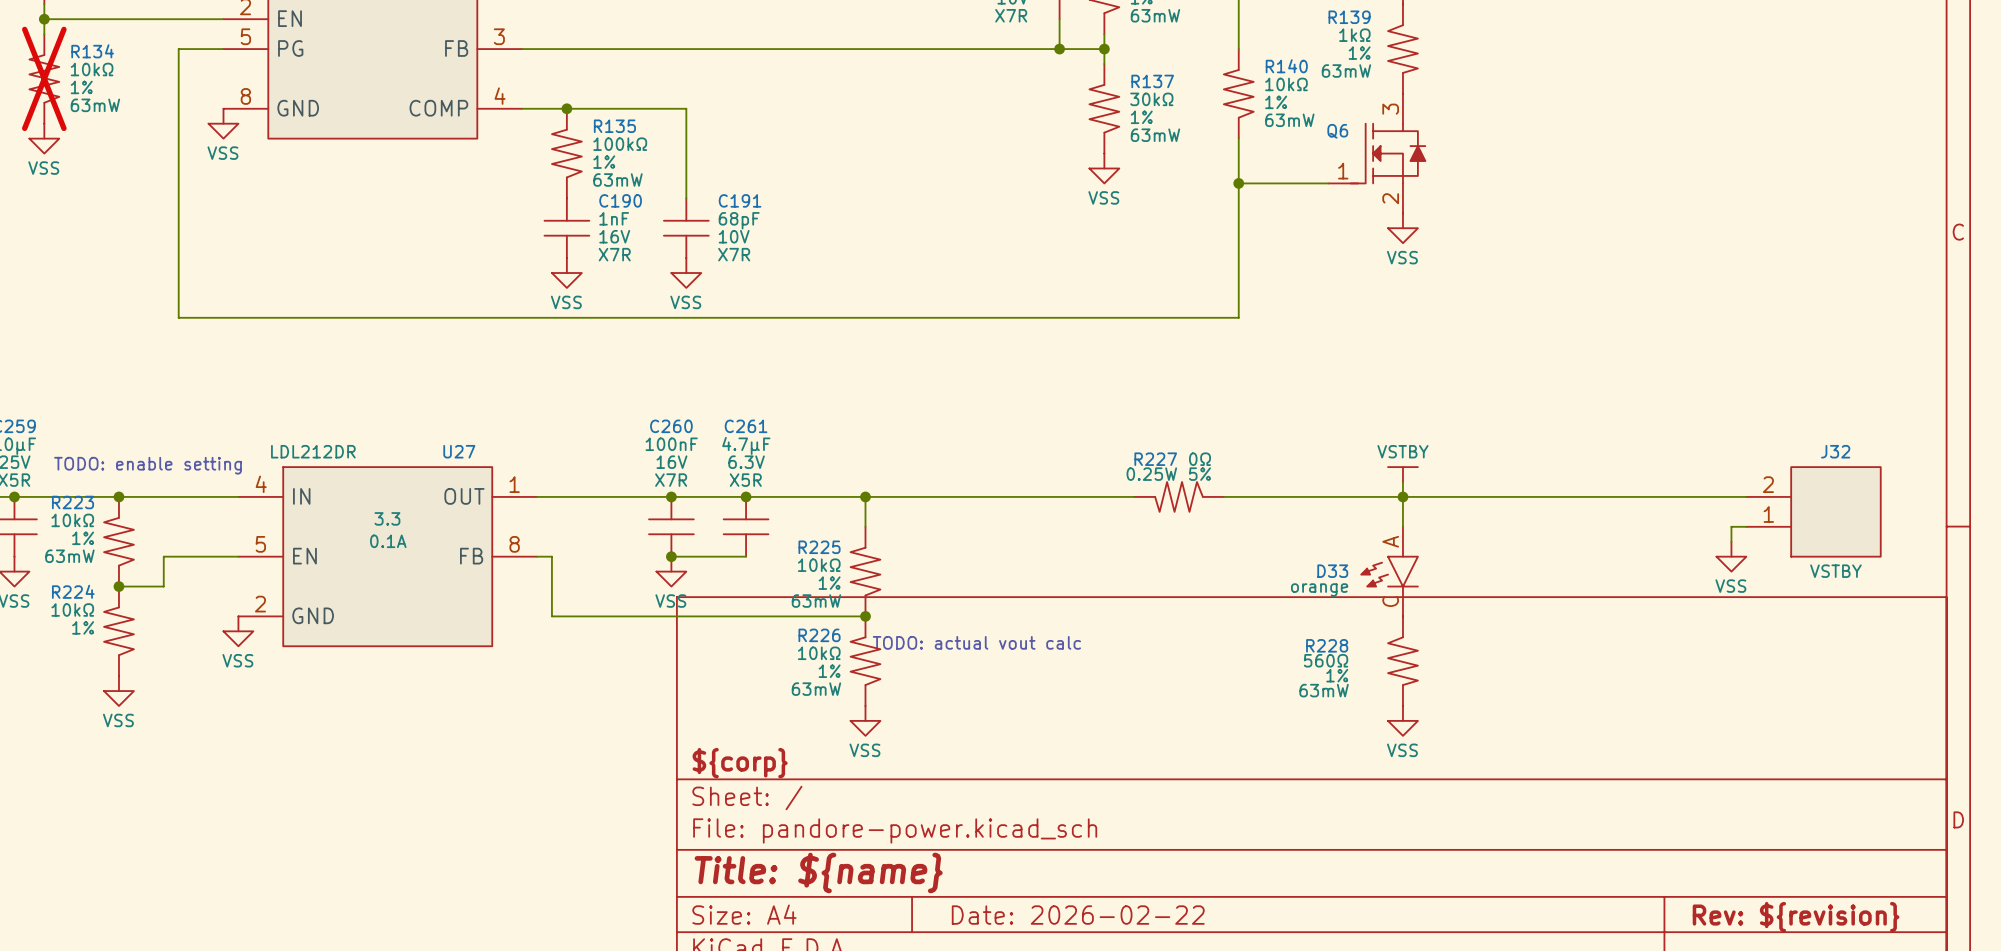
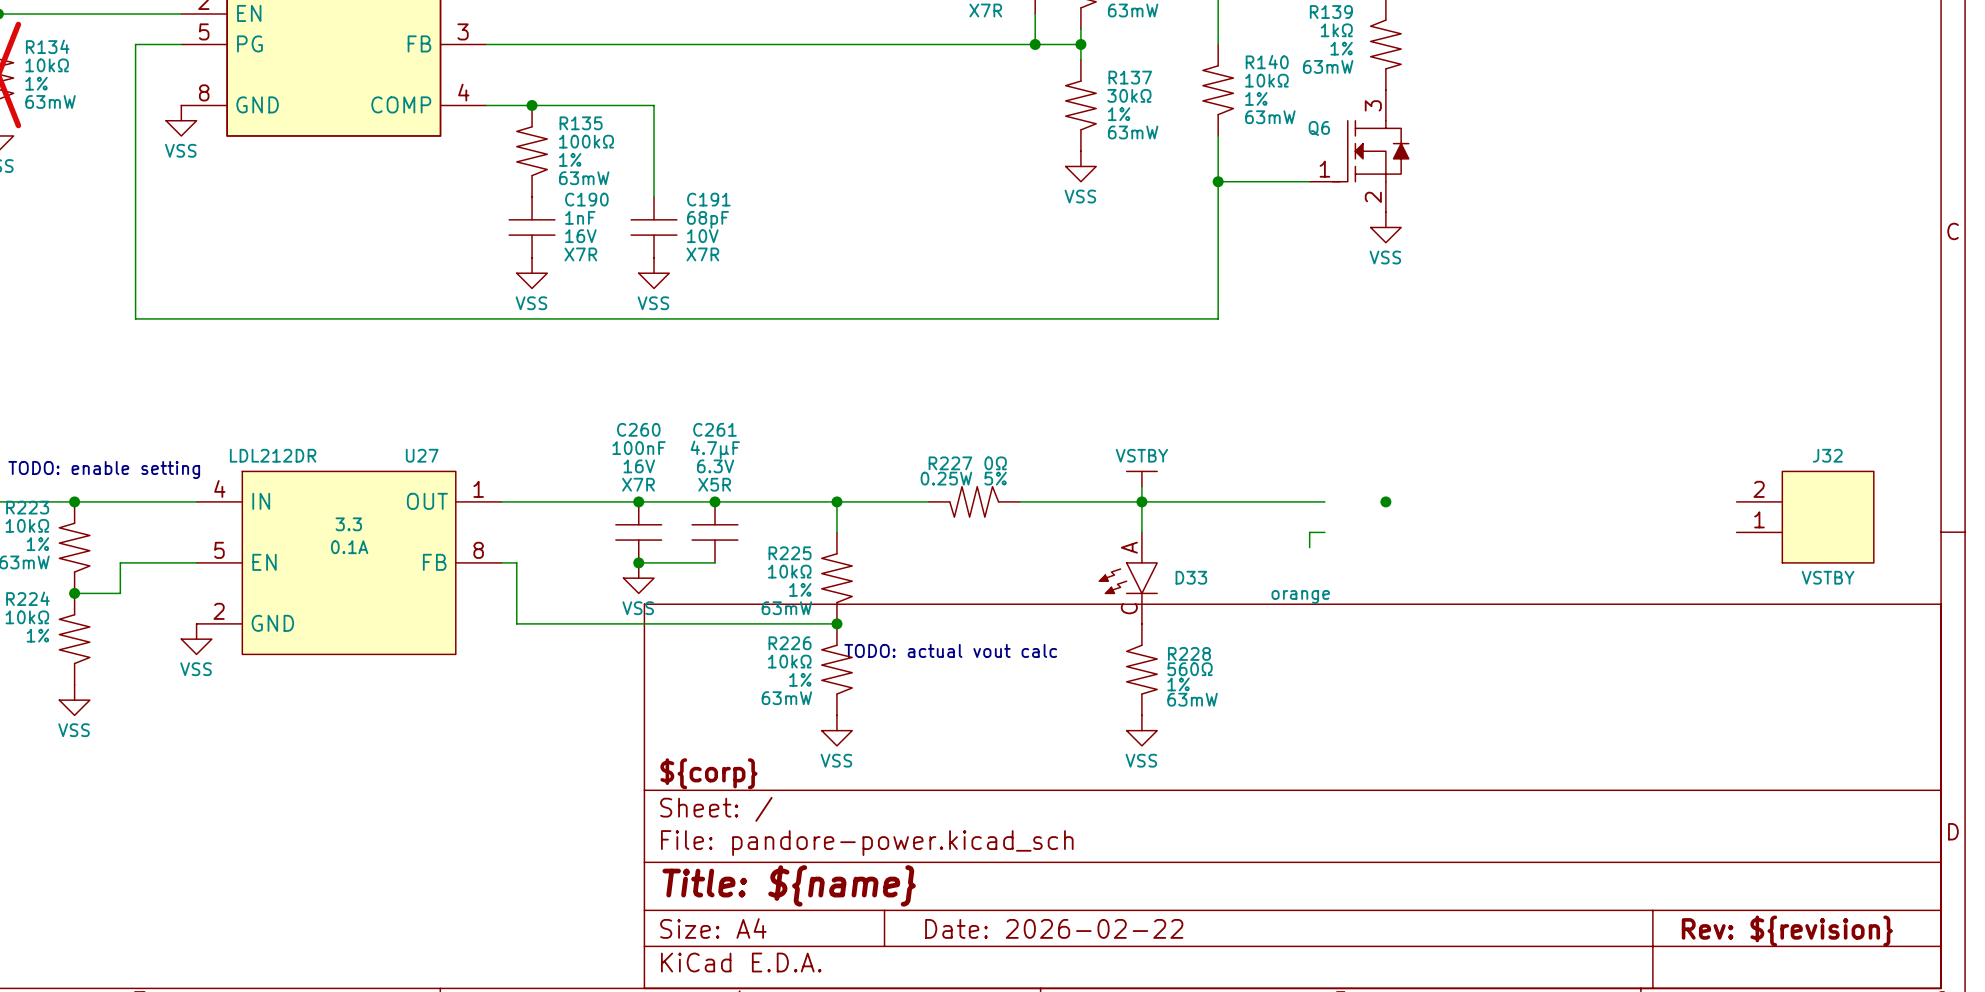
power symbol position: VSTBY (1402, 474) -> VSTBY (1141, 479)
wire: (1402, 482) (1402, 526) -> (1141, 486) (1141, 532)
junction: none -> (1141, 501)
R227 position: (1179, 496) -> (974, 501)
wire: (1343, 496) (1746, 496) -> none
wire: none -> (1324, 532) (1309, 532) (1309, 547)
wire: (1746, 526) (1731, 526) (1731, 541) -> none
power symbol: VSS (1731, 556) -> none
D33 name position: D33 (1332, 571) -> D33 (1191, 577)
D33 position: (1389, 571) -> (1128, 578)
R228 name position: R228 (1327, 645) -> R228 (1189, 653)
R228 text position: 560Ω (1326, 660) -> 560Ω (1190, 669)
R228 position: (1402, 661) -> (1141, 669)
R228 text position: 1% (1337, 675) -> 1% (1178, 684)
R228 text position: 63mW (1324, 690) -> 63mW (1192, 699)
power symbol position: VSS (1402, 720) -> VSS (1141, 730)

